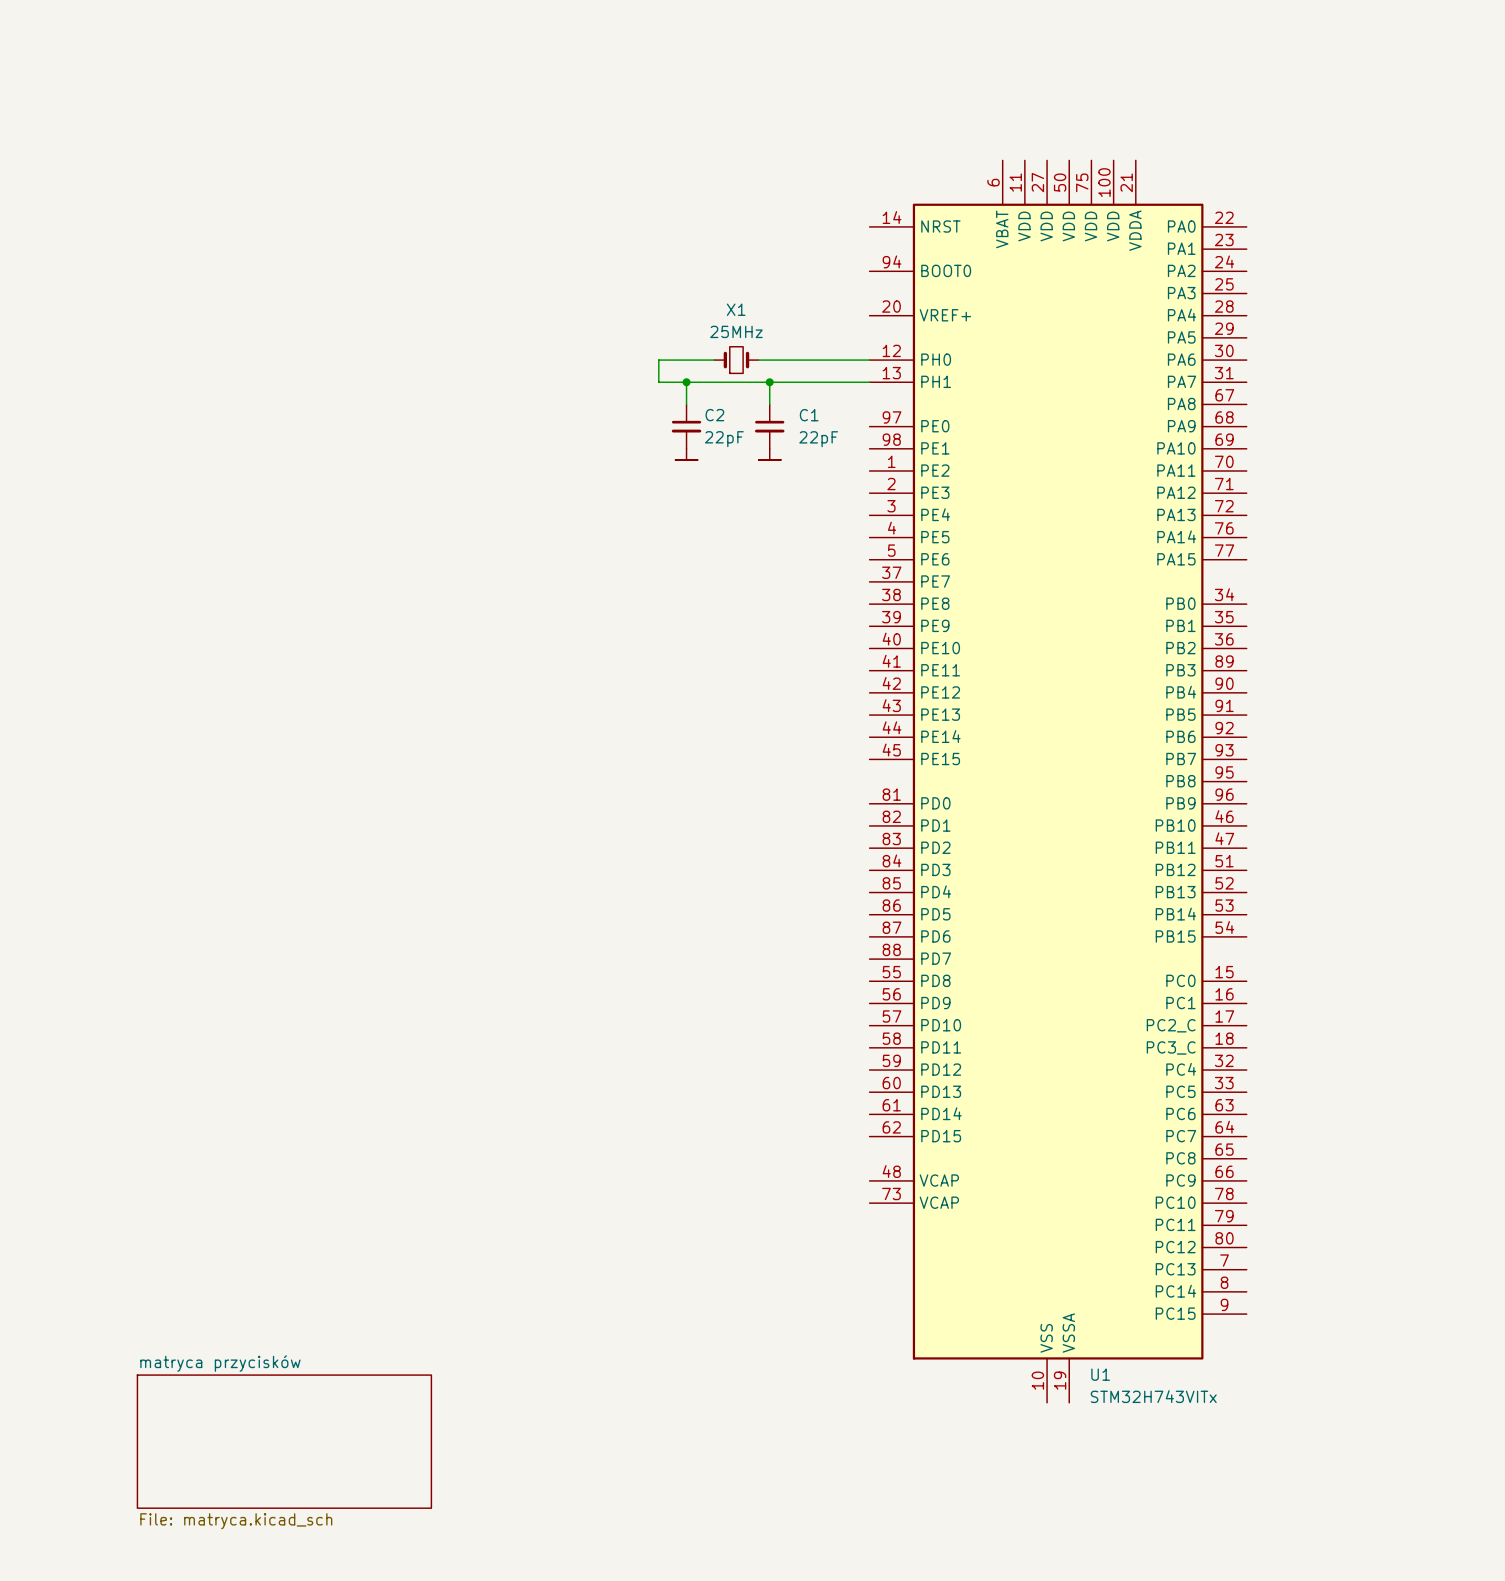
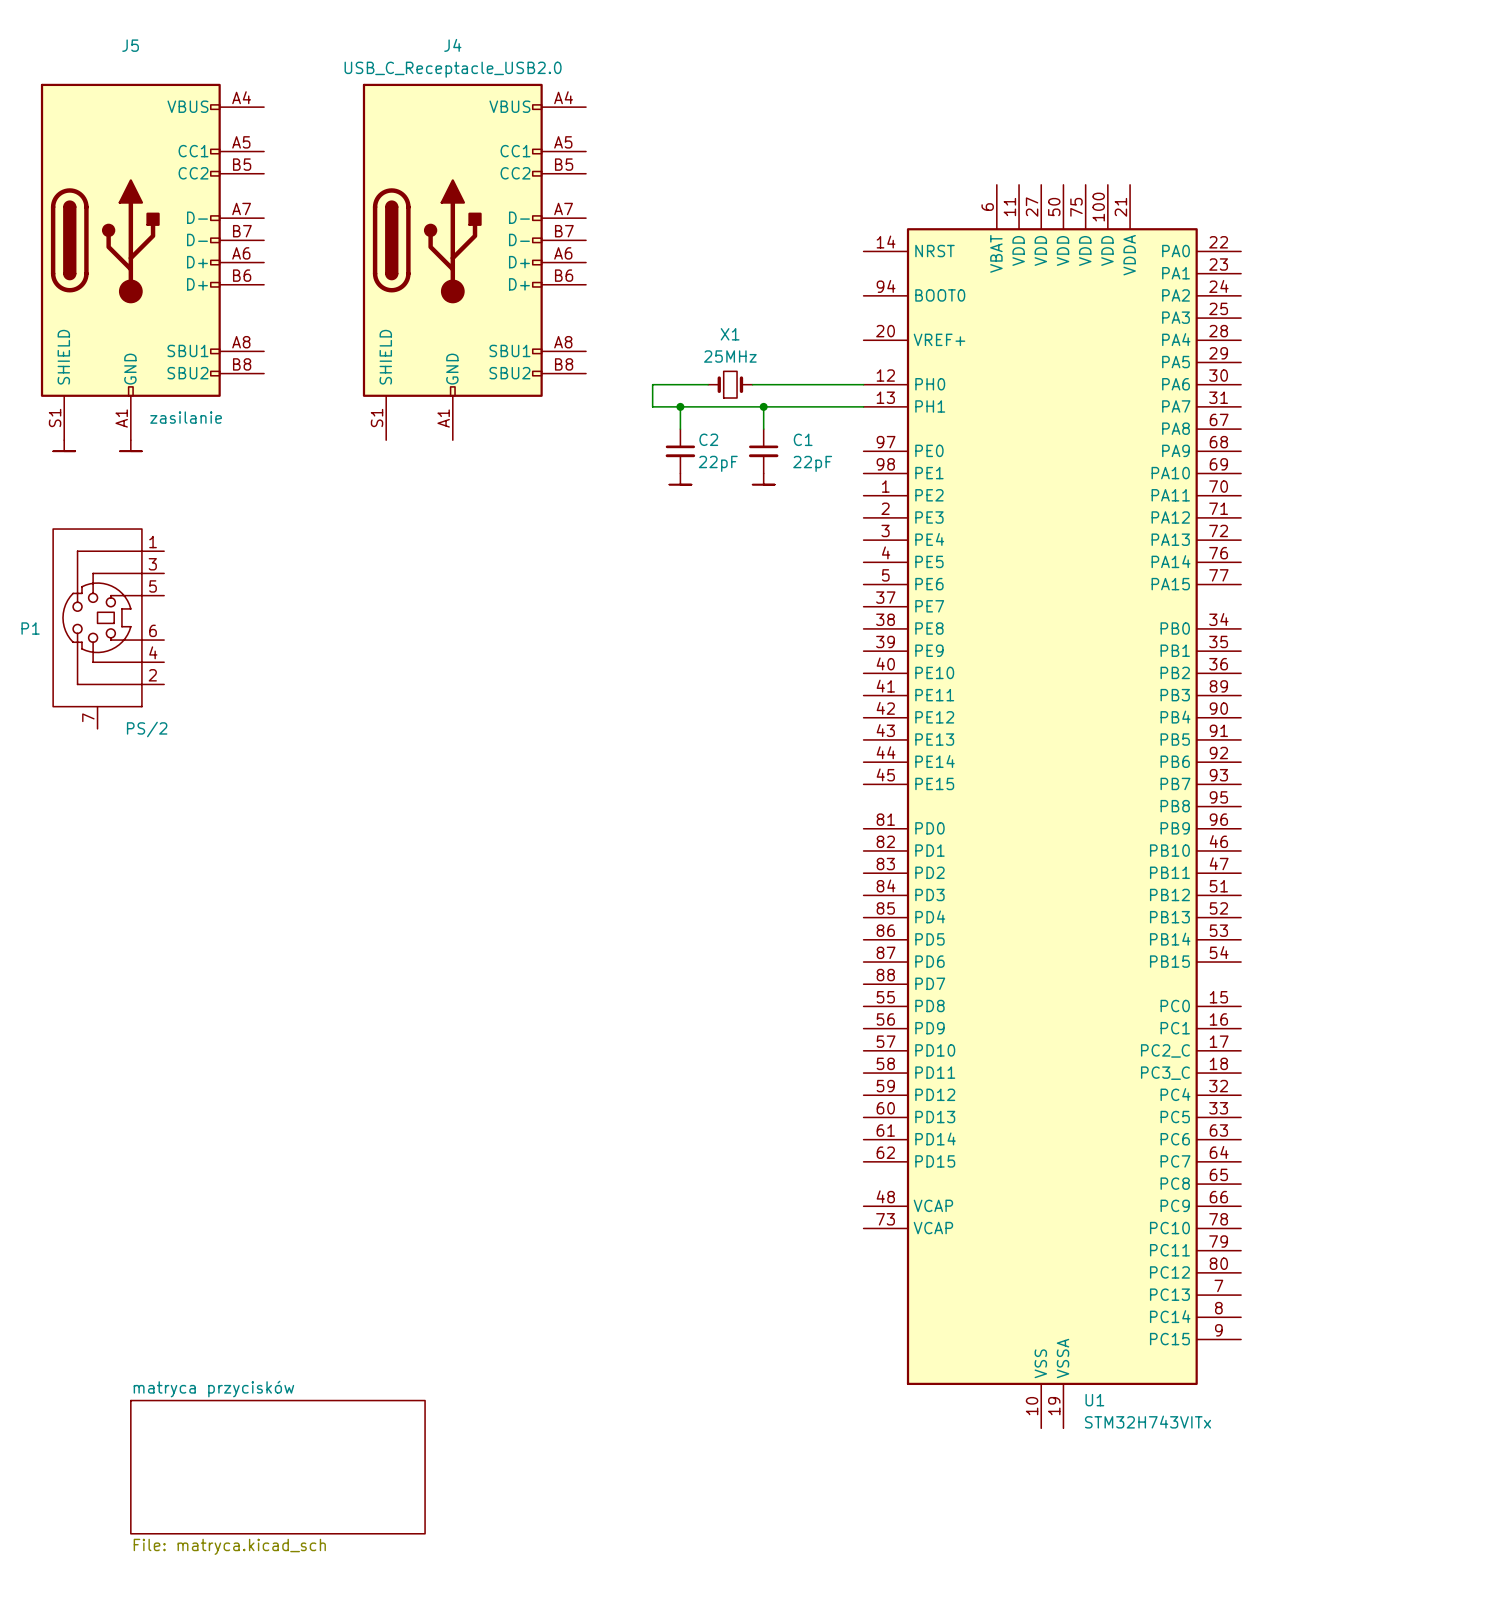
J5: none -> zasilanie (152, 262)
J4: none -> USB_C_Receptacle_USB2.0 (474, 262)
power symbol: none -> (64, 445)
power symbol: none -> (130, 445)
P1: none -> PS/2 (108, 628)

